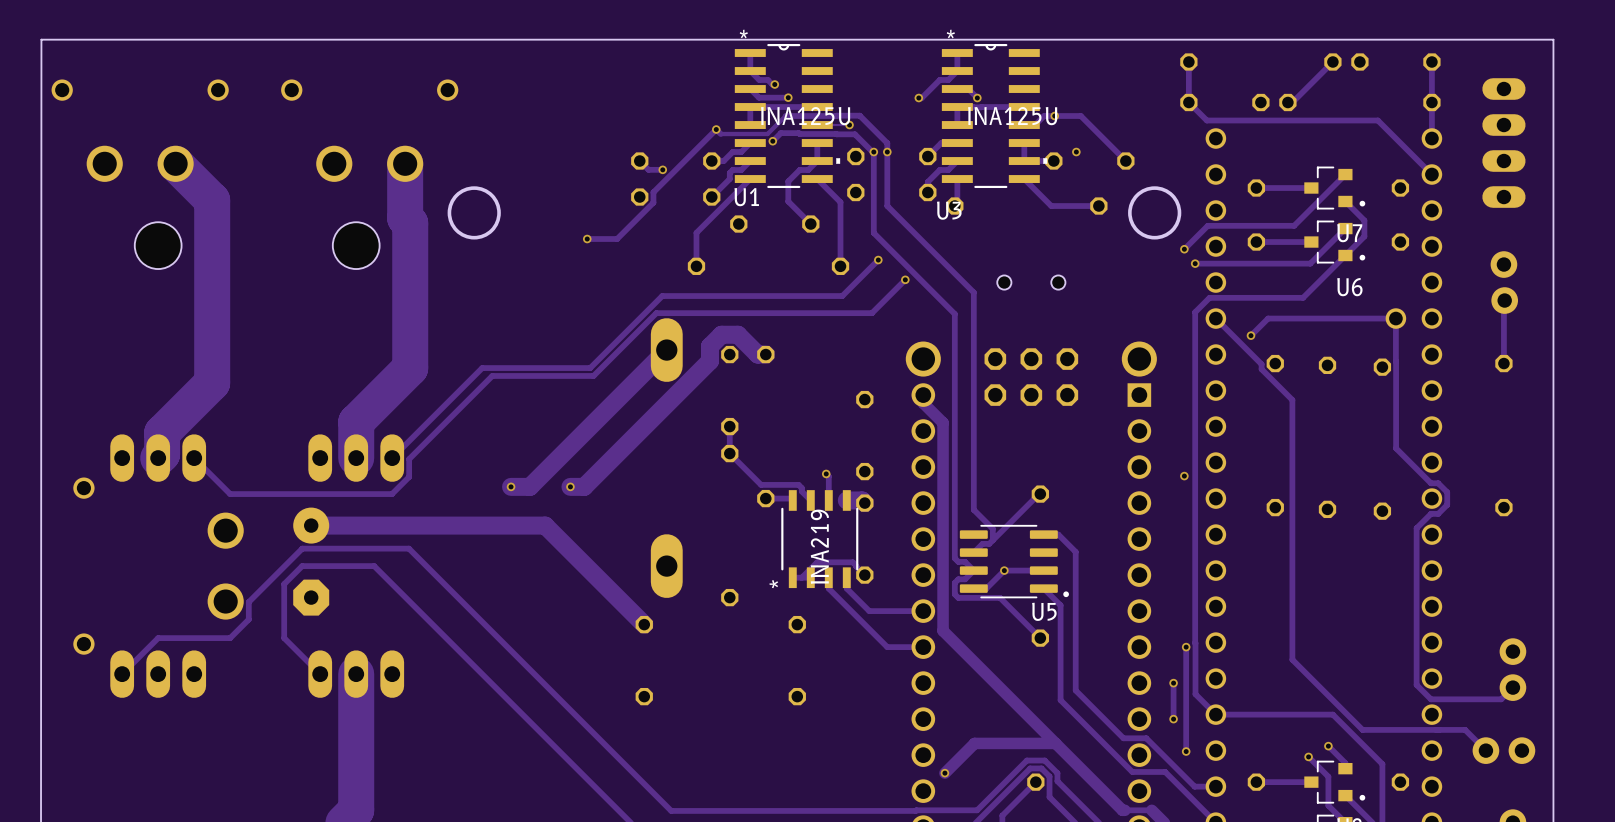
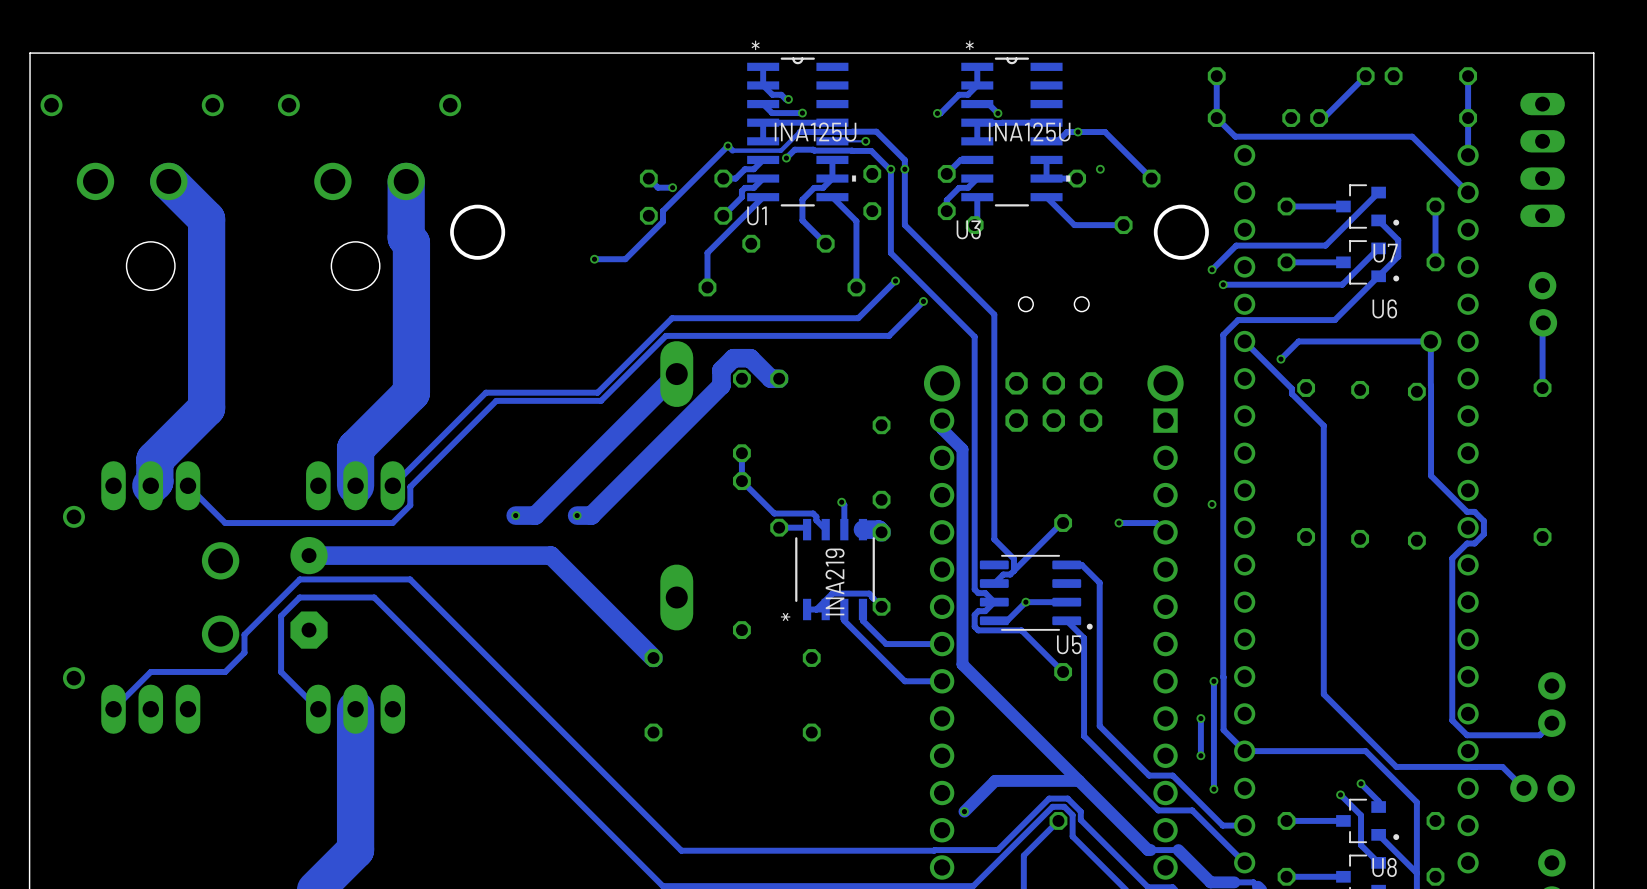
track: none -> (1435, 206) (1435, 262)
track: none -> (1118, 523) (1156, 523) (1165, 532)
via: none -> (1118, 523)

